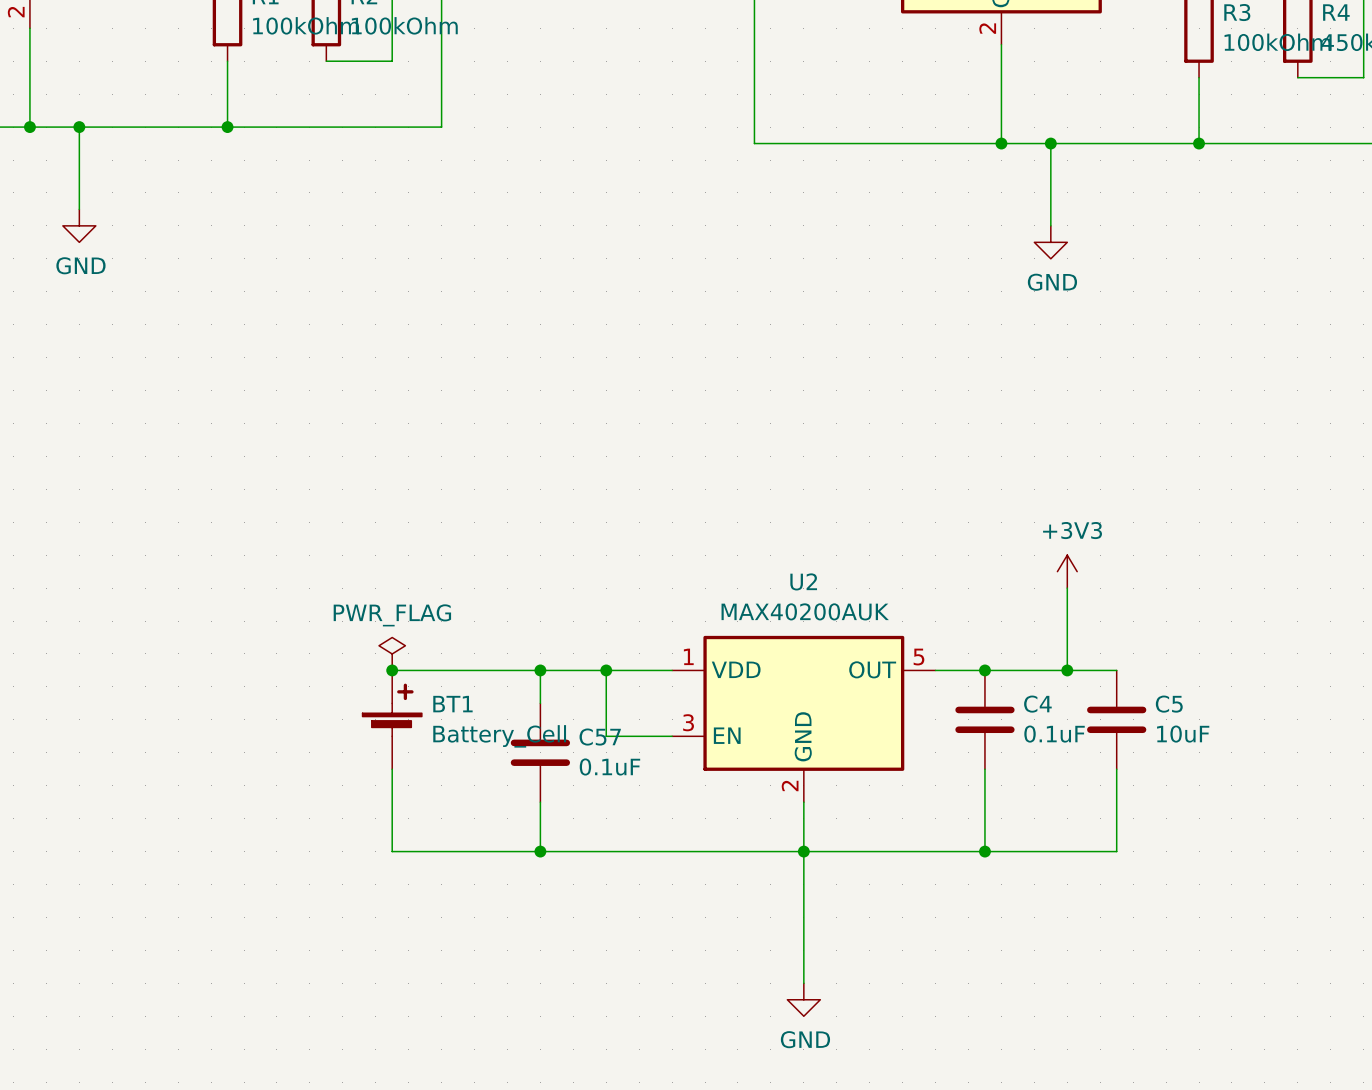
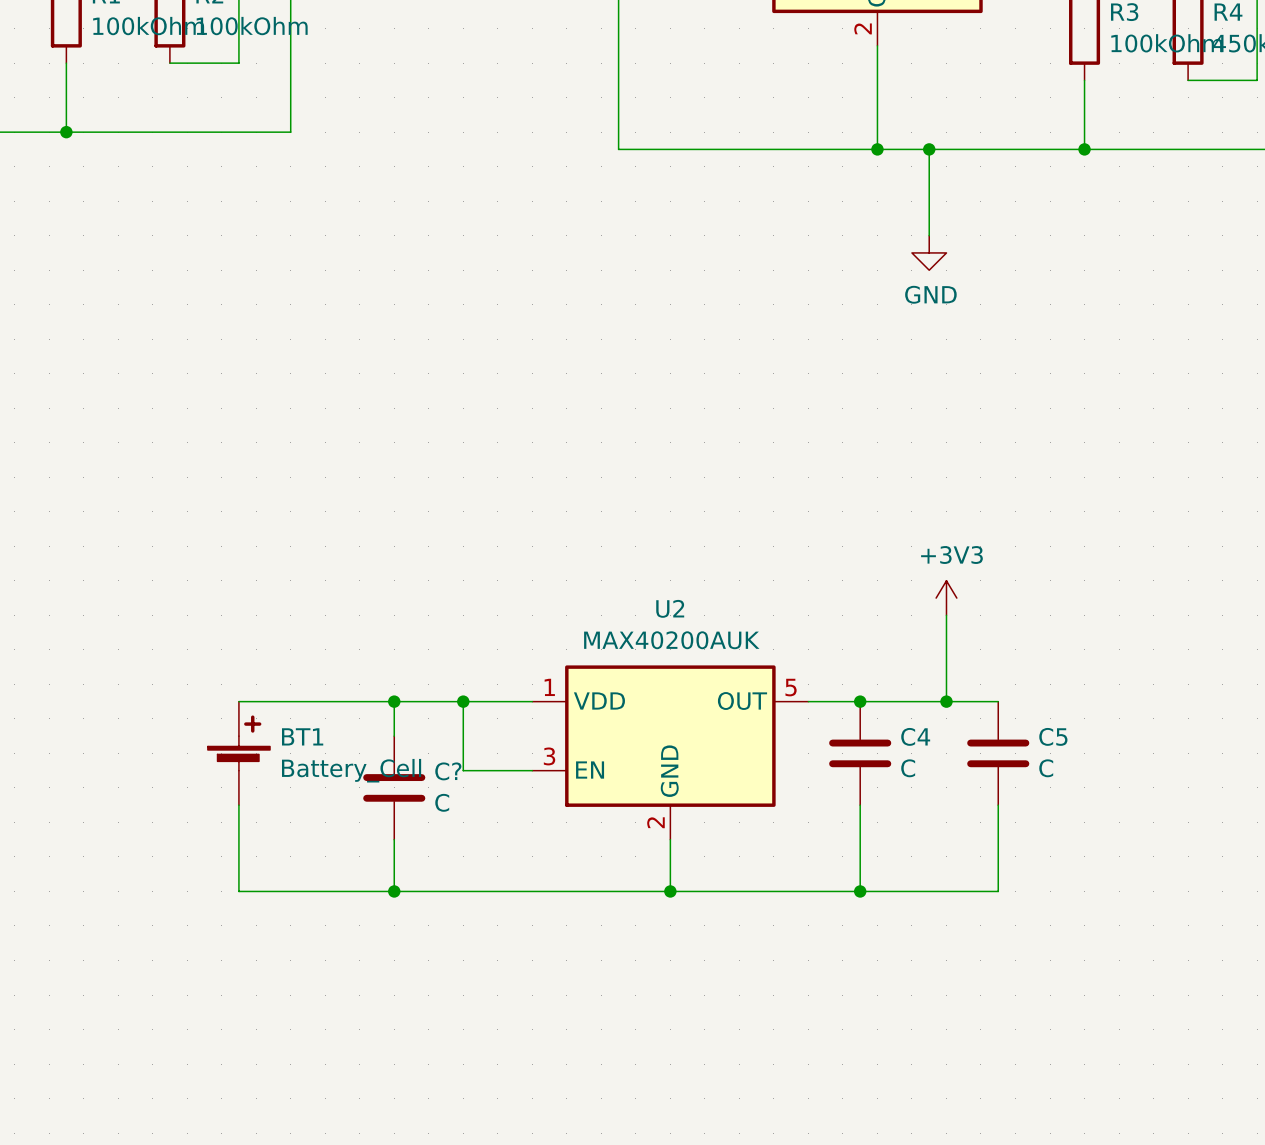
power symbol: PWR_FLAG (392, 653) -> none
junction: (392, 670) -> none
C4 value: 0.1uF (1054, 734) -> C (908, 768)
C5 value: 10uF (1183, 734) -> C (1046, 768)
C57 name: C57 (600, 737) -> C? (448, 771)
C57 value: 0.1uF (609, 766) -> C (442, 802)
wire: (803, 851) (803, 983) -> none
power symbol: GND (803, 999) -> none

